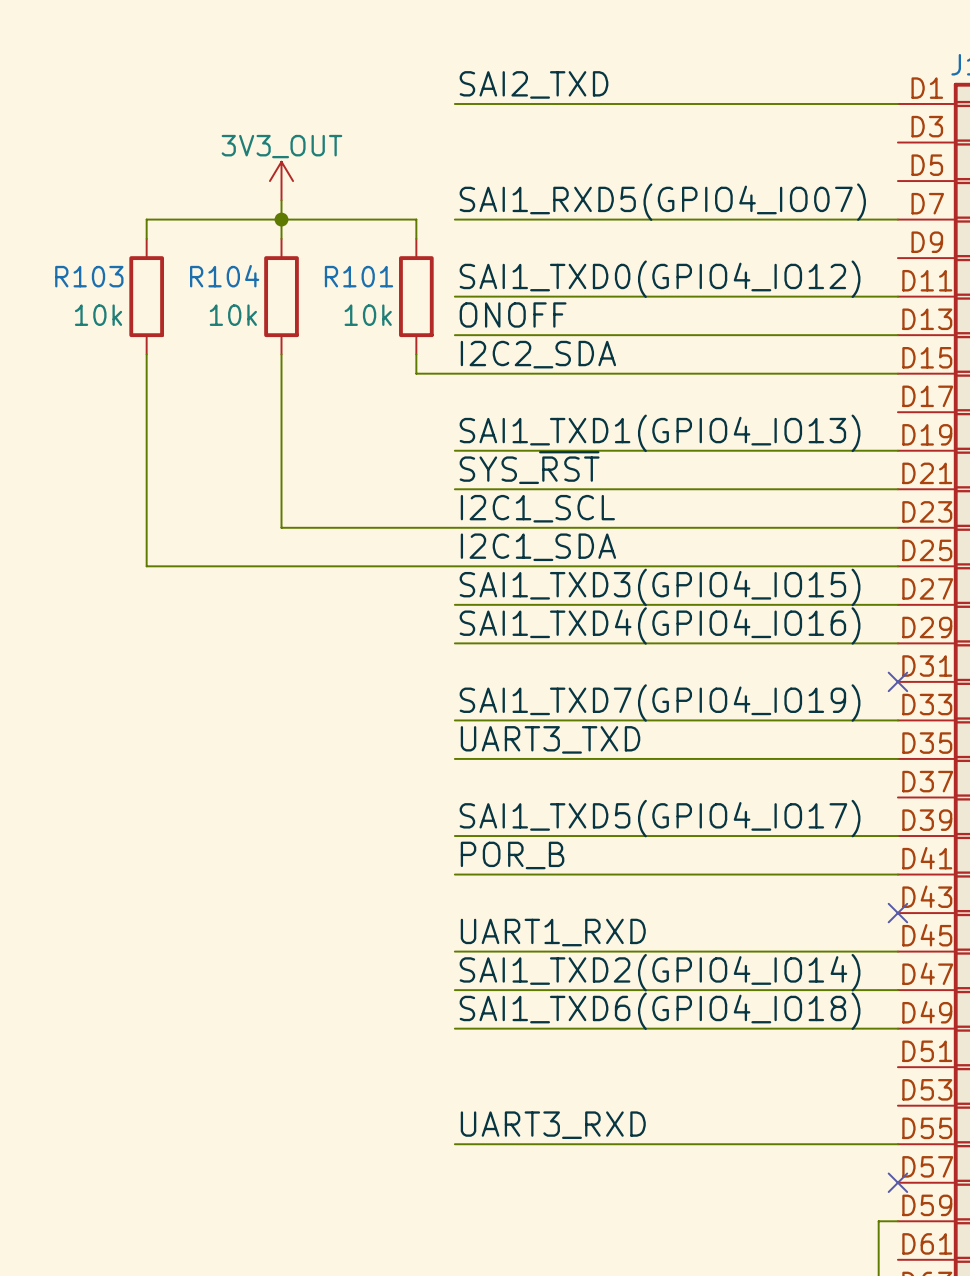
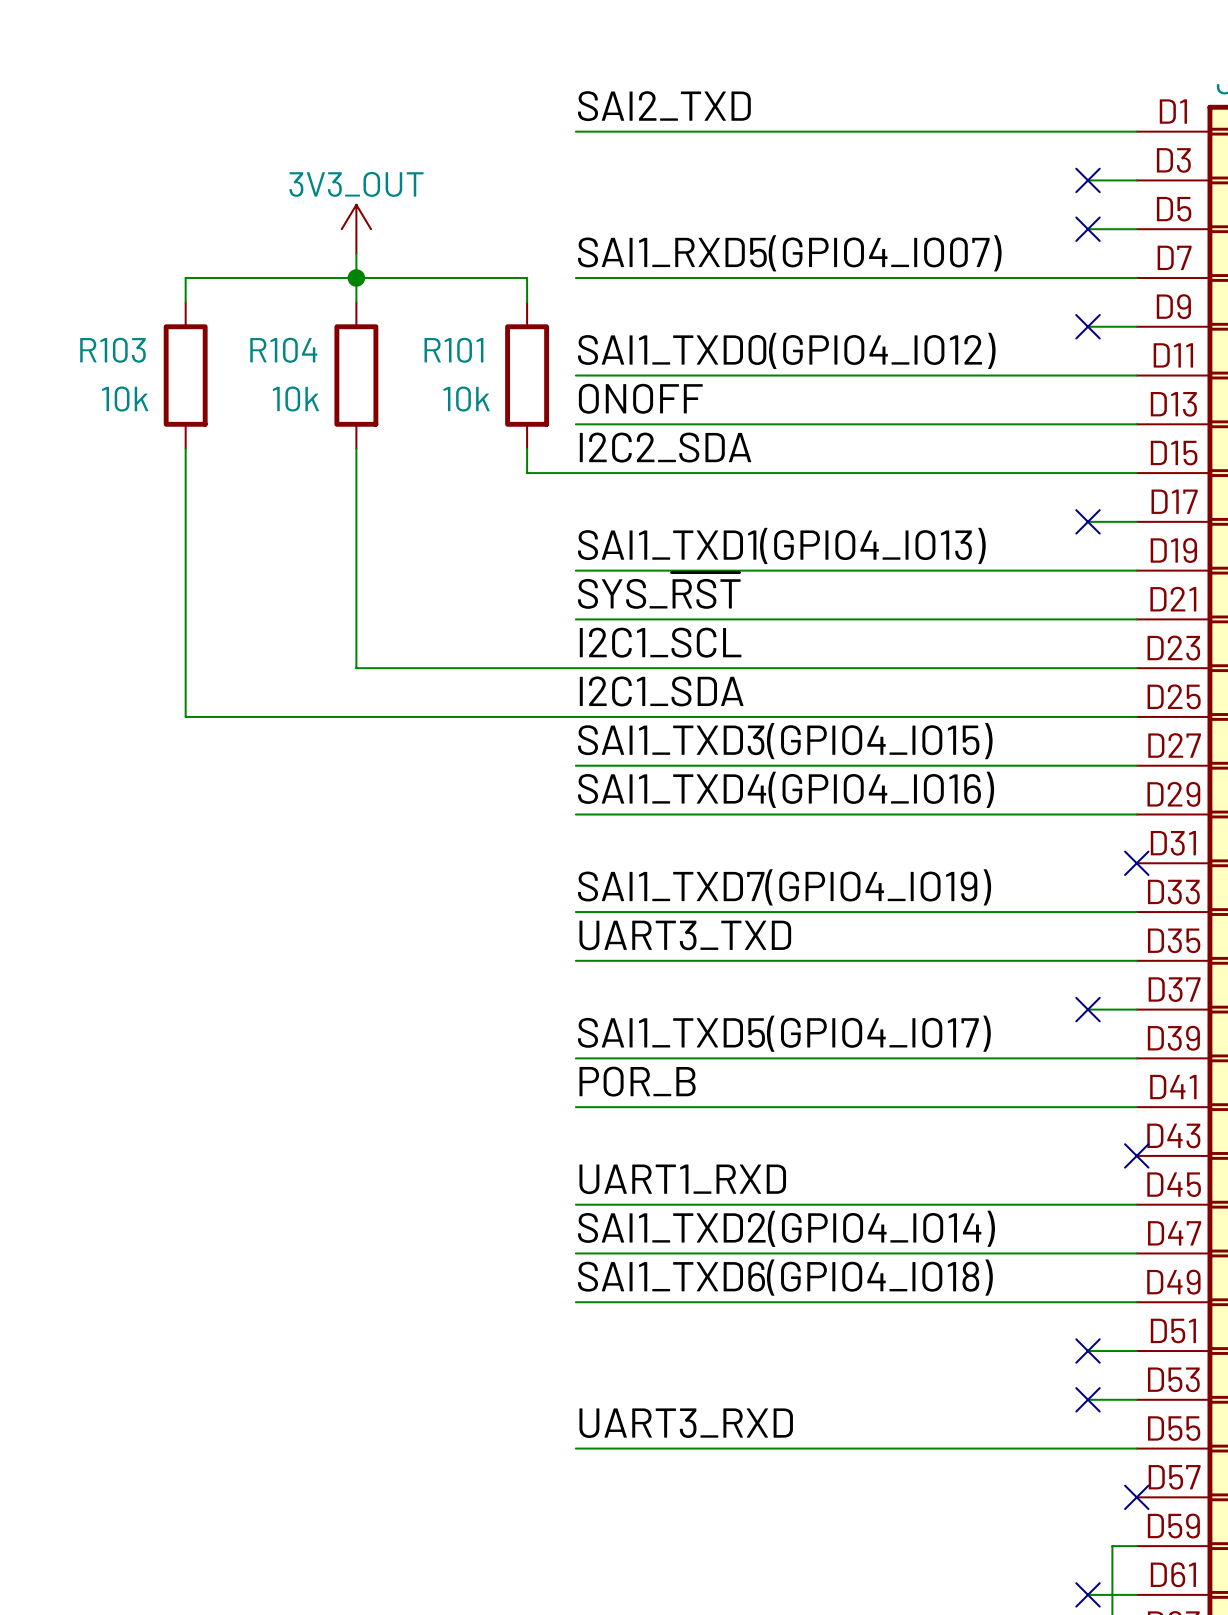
wire: none -> (1088, 180) (1136, 180)
no-connect mark: none -> (1088, 180)
wire: none -> (1088, 229) (1136, 229)
no-connect mark: none -> (1088, 229)
wire: none -> (1088, 326) (1136, 326)
no-connect mark: none -> (1088, 326)
wire: none -> (1088, 521) (1136, 521)
no-connect mark: none -> (1088, 521)
wire: none -> (1088, 1009) (1136, 1009)
no-connect mark: none -> (1088, 1009)
wire: none -> (1088, 1351) (1136, 1351)
no-connect mark: none -> (1088, 1351)
wire: none -> (1088, 1399) (1136, 1399)
no-connect mark: none -> (1088, 1399)
wire: none -> (1088, 1594) (1136, 1594)
no-connect mark: none -> (1088, 1594)

